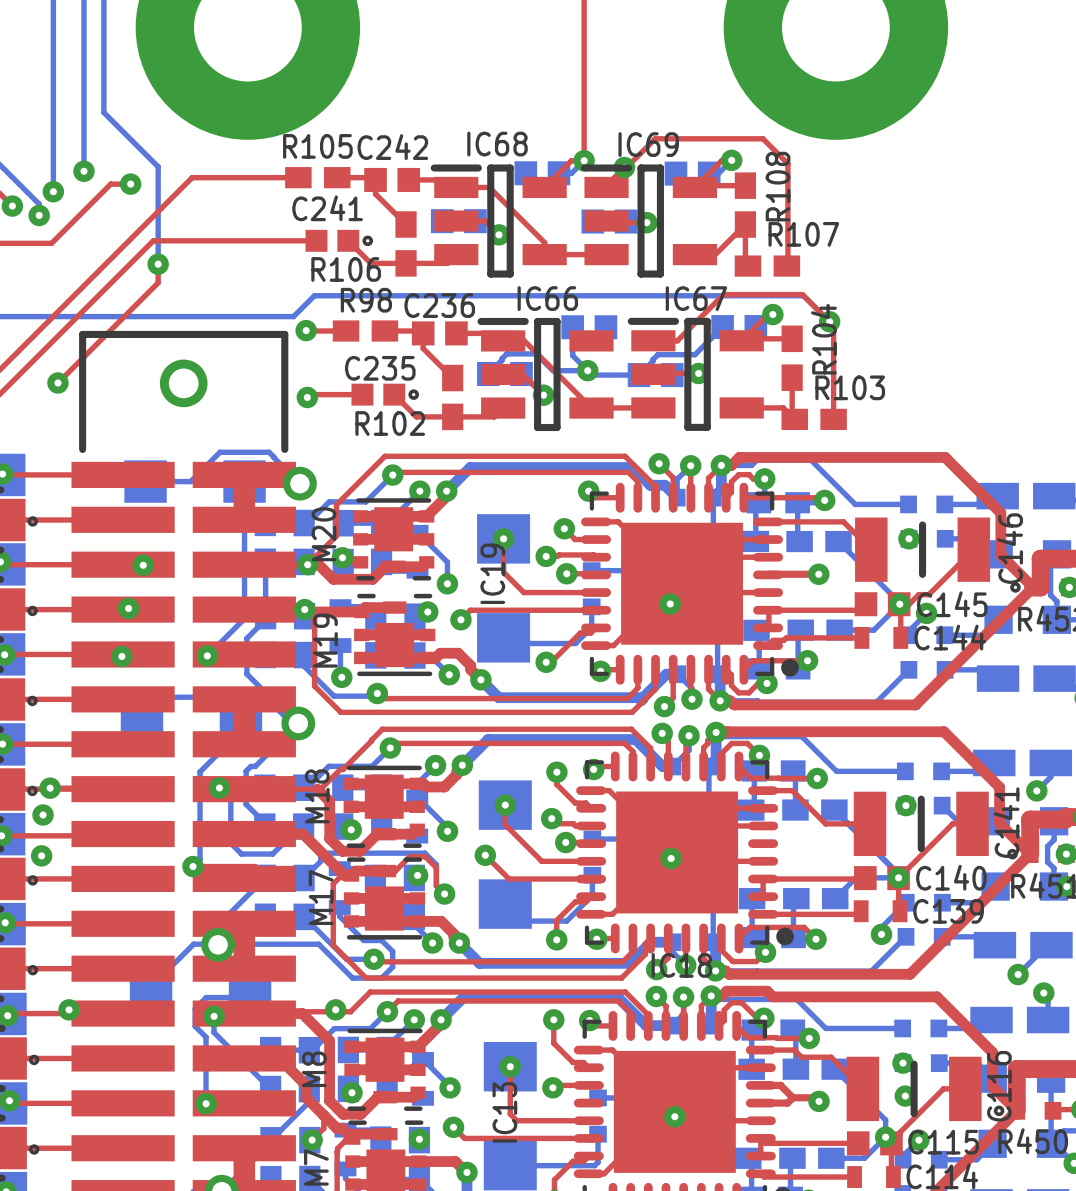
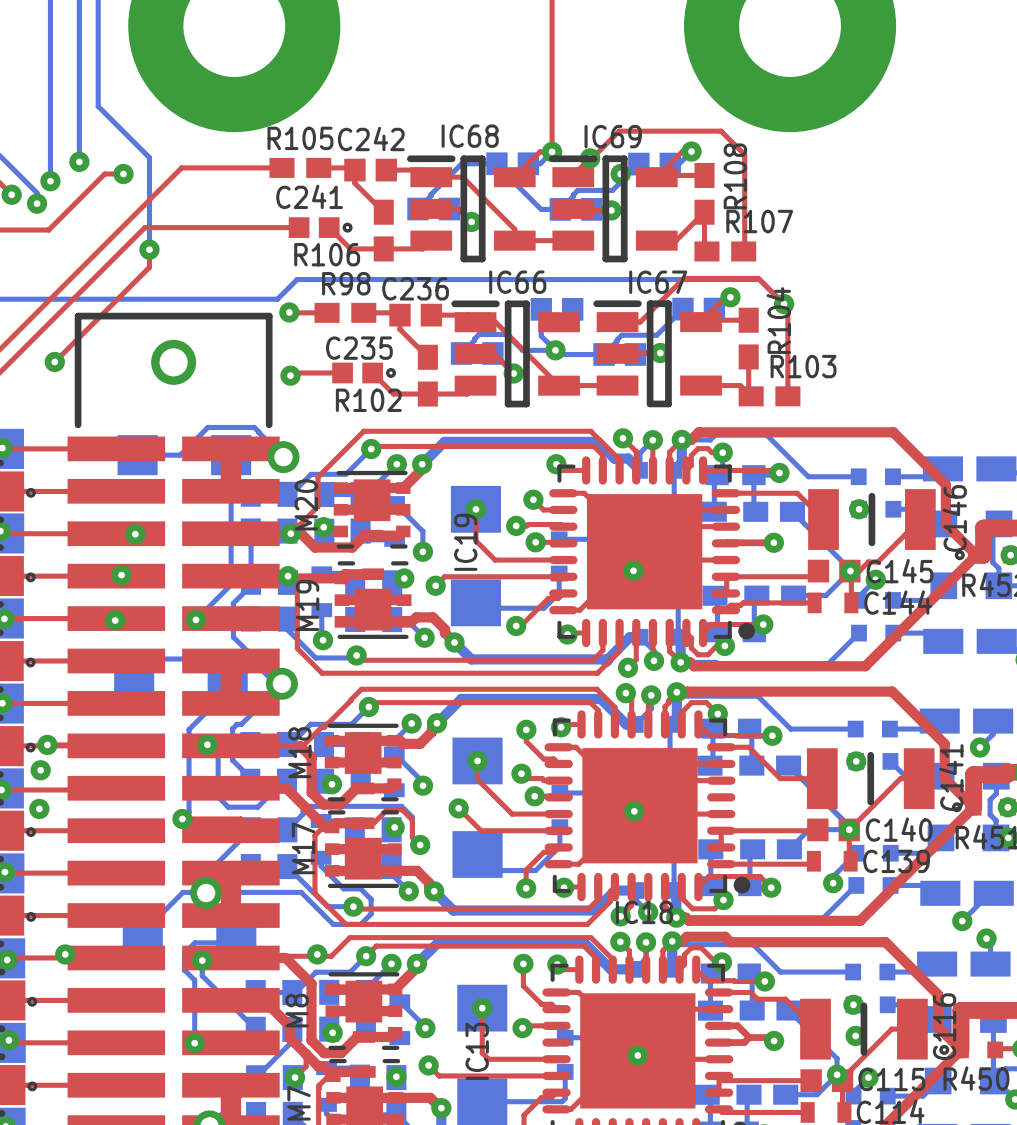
bottom track: none -> (638, 164) (612, 190) (577, 190) (560, 209) (541, 209) (496, 163) (461, 163) (417, 209)
via: none -> (620, 174)

